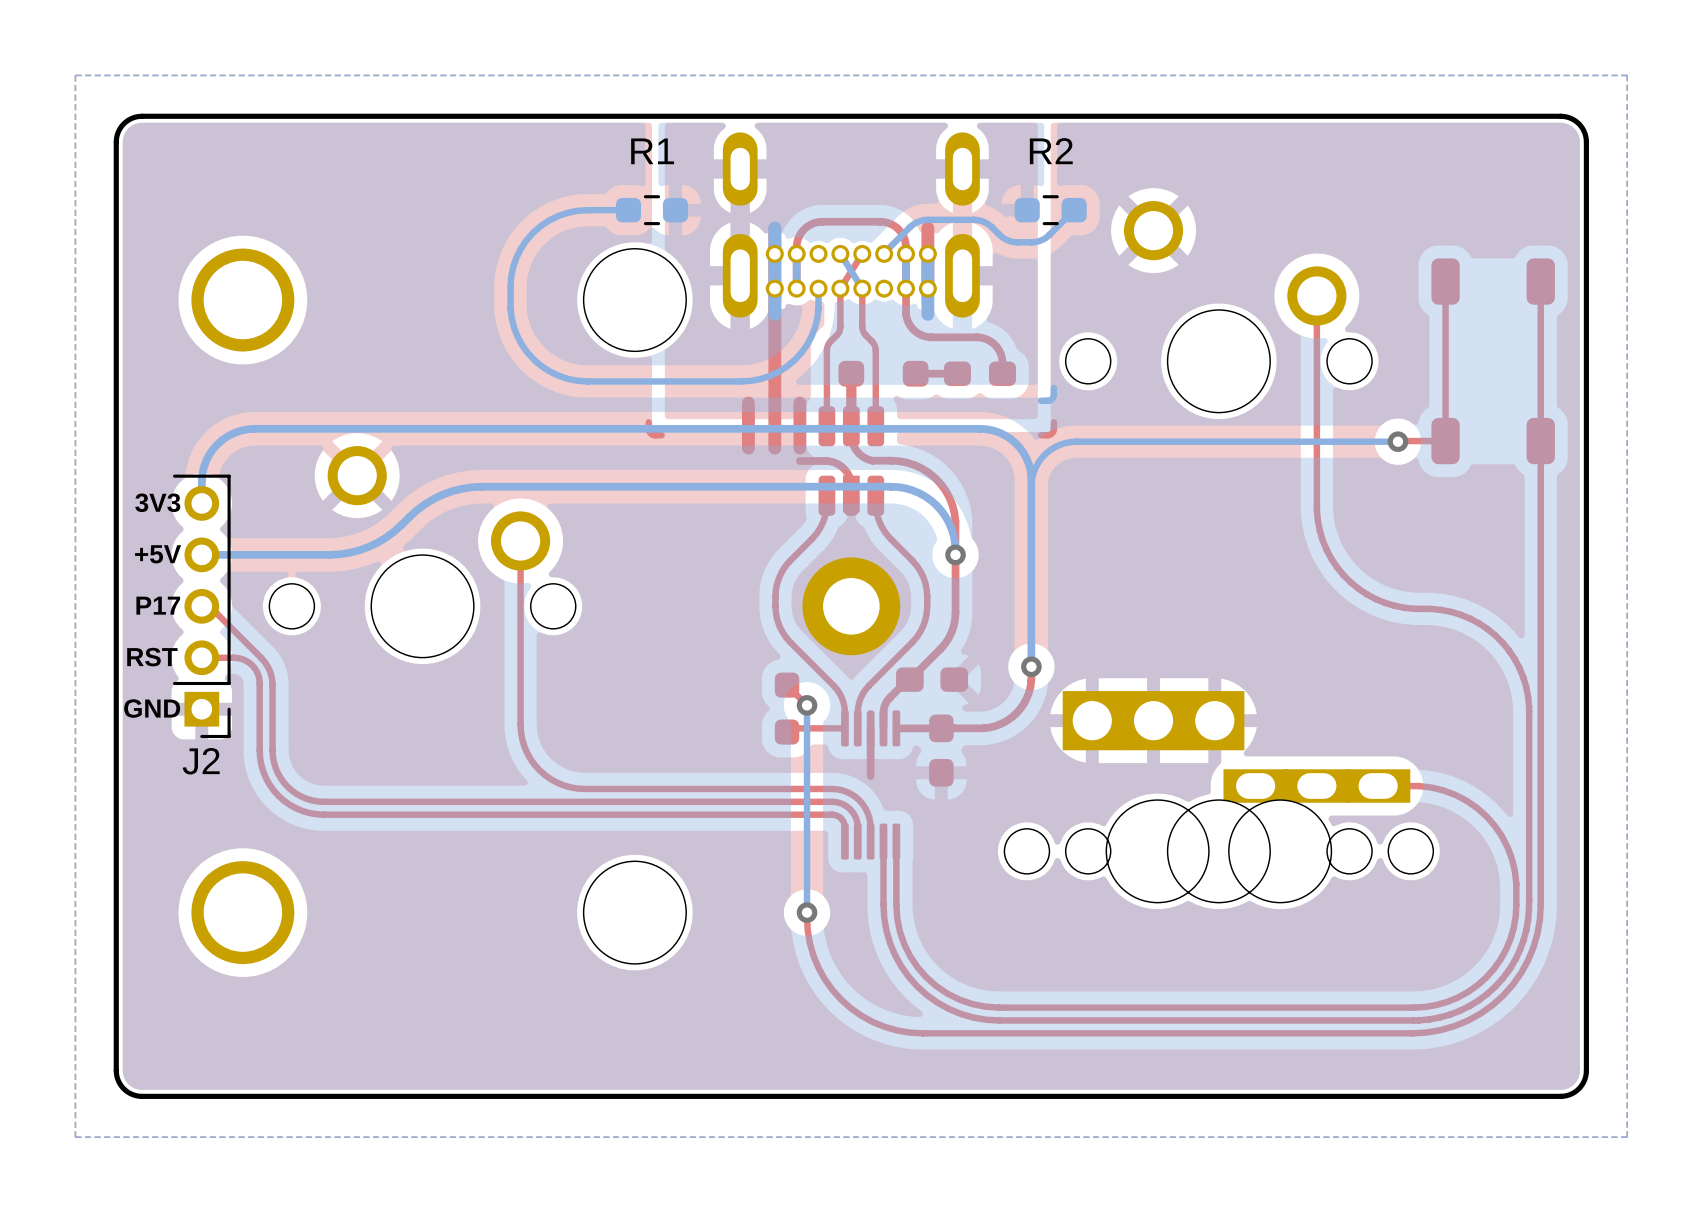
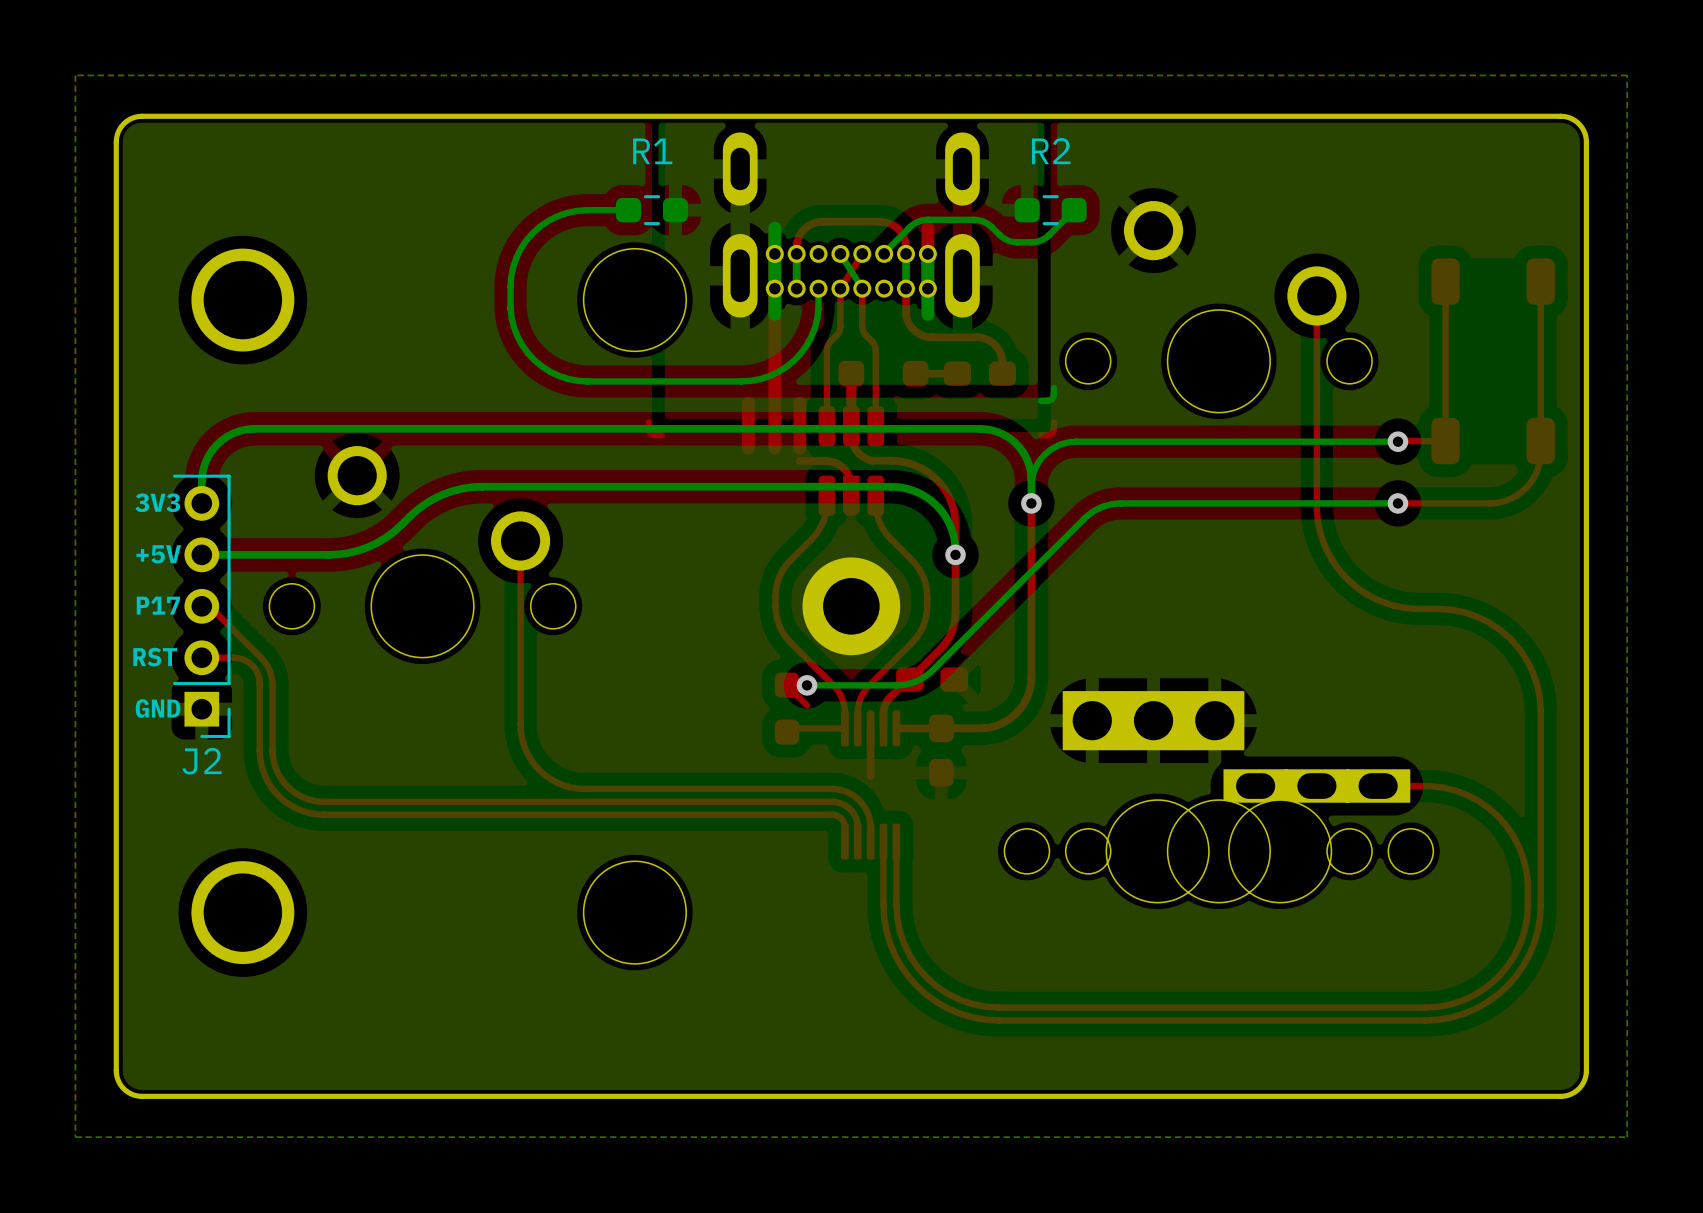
top track: (1540, 441) (1540, 711) -> none
top track: none -> (1540, 451) (1539, 463) (1532, 479) (1521, 492) (1506, 500) (1489, 503) (1397, 503)
via: none -> (1031, 503)
bottom track: none -> (1397, 503) (1120, 503) (1106, 505) (1084, 518) (924, 676) (901, 685) (807, 685)
via: none -> (1397, 503)
top track: (1426, 608) (1441, 609) (1460, 614) (1487, 629) (1508, 650) (1523, 677) (1529, 706) (1529, 899) -> (1426, 608) (1451, 609) (1477, 616) (1489, 622) (1510, 639) (1526, 660) (1532, 672) (1537, 685) (1540, 711)
via: (1031, 666) -> none
bottom track: (807, 705) (807, 912) -> none
via position: (807, 705) -> (807, 685)
top track: (1418, 786) (1443, 790) (1466, 800) (1476, 807) (1494, 825) (1507, 847) (1511, 859) (1516, 883) (1516, 904) (1510, 938) (1500, 959) (1486, 977) (1458, 997) (1436, 1005) (1413, 1007) -> (1418, 786) (1442, 787) (1466, 794) (1478, 800) (1497, 816) (1513, 836) (1523, 859) (1527, 883) (1527, 904) (1527, 918) (1520, 944) (1506, 967) (1497, 977) (1487, 986) (1464, 999) (1438, 1006) (1413, 1007)
top track: (1529, 899) (1526, 930) (1520, 949) (1510, 967) (1495, 986) (1478, 1000) (1460, 1010) (1439, 1017) (1413, 1020) -> (1540, 904) (1537, 930) (1529, 954) (1506, 986) (1486, 1002) (1463, 1013) (1437, 1019) (1413, 1020)
top track: (1540, 904) (1539, 919) (1533, 947) (1521, 973) (1503, 995) (1492, 1005) (1467, 1020) (1440, 1030) (1412, 1033) (922, 1033) (897, 1030) (861, 1015) (832, 989) (813, 955) (807, 930) (807, 912) -> none
via: (807, 912) -> none

